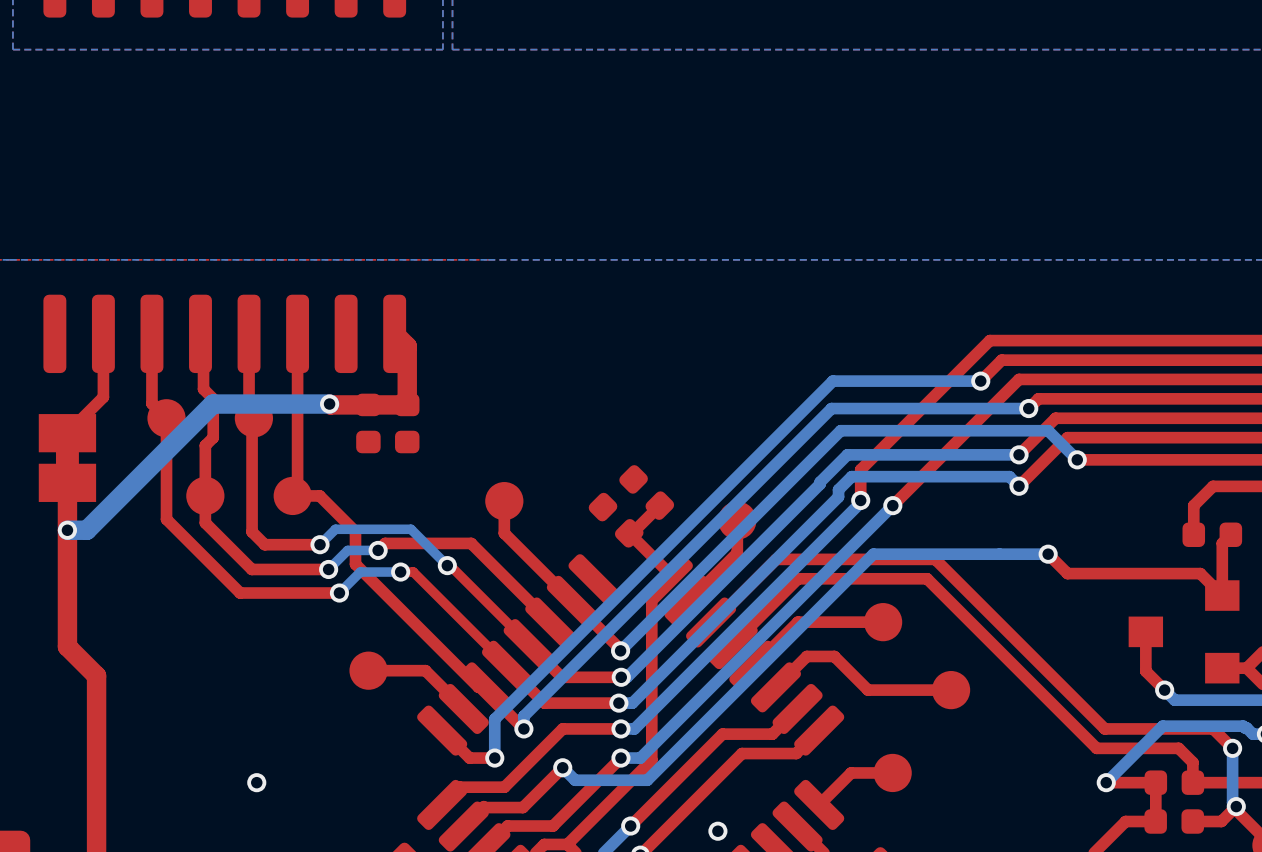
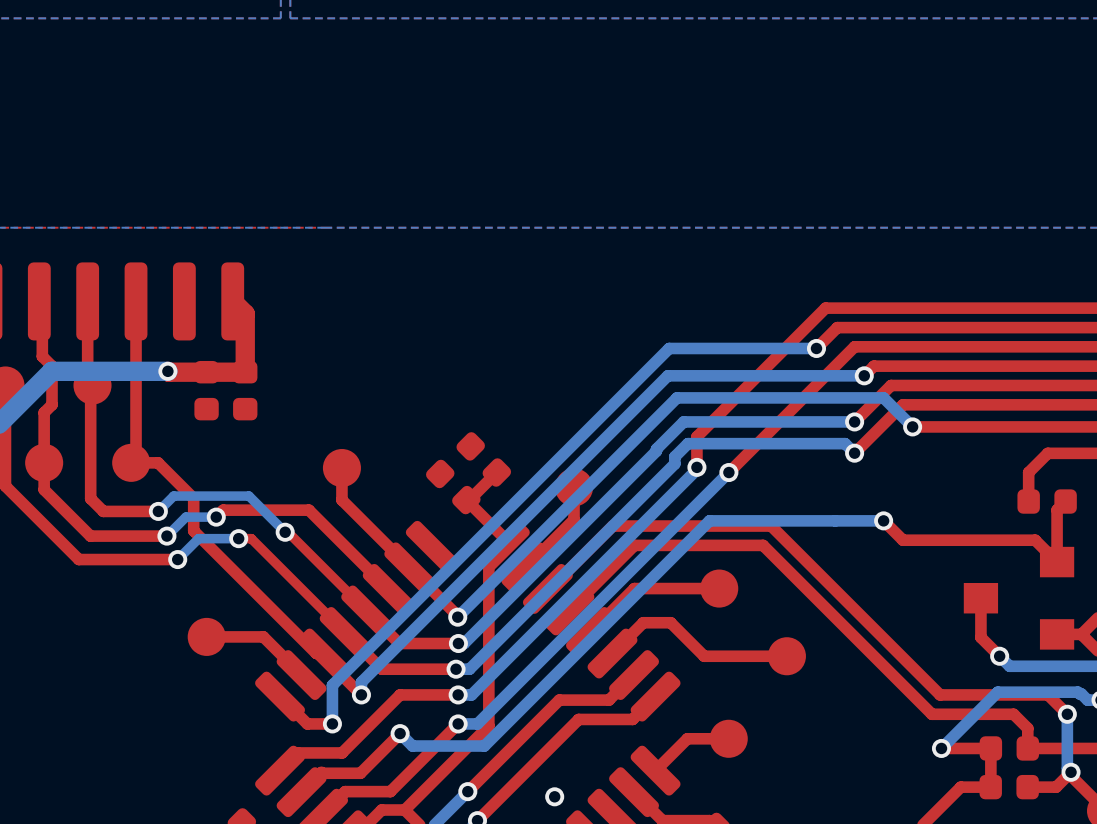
via: (256, 782) -> none

